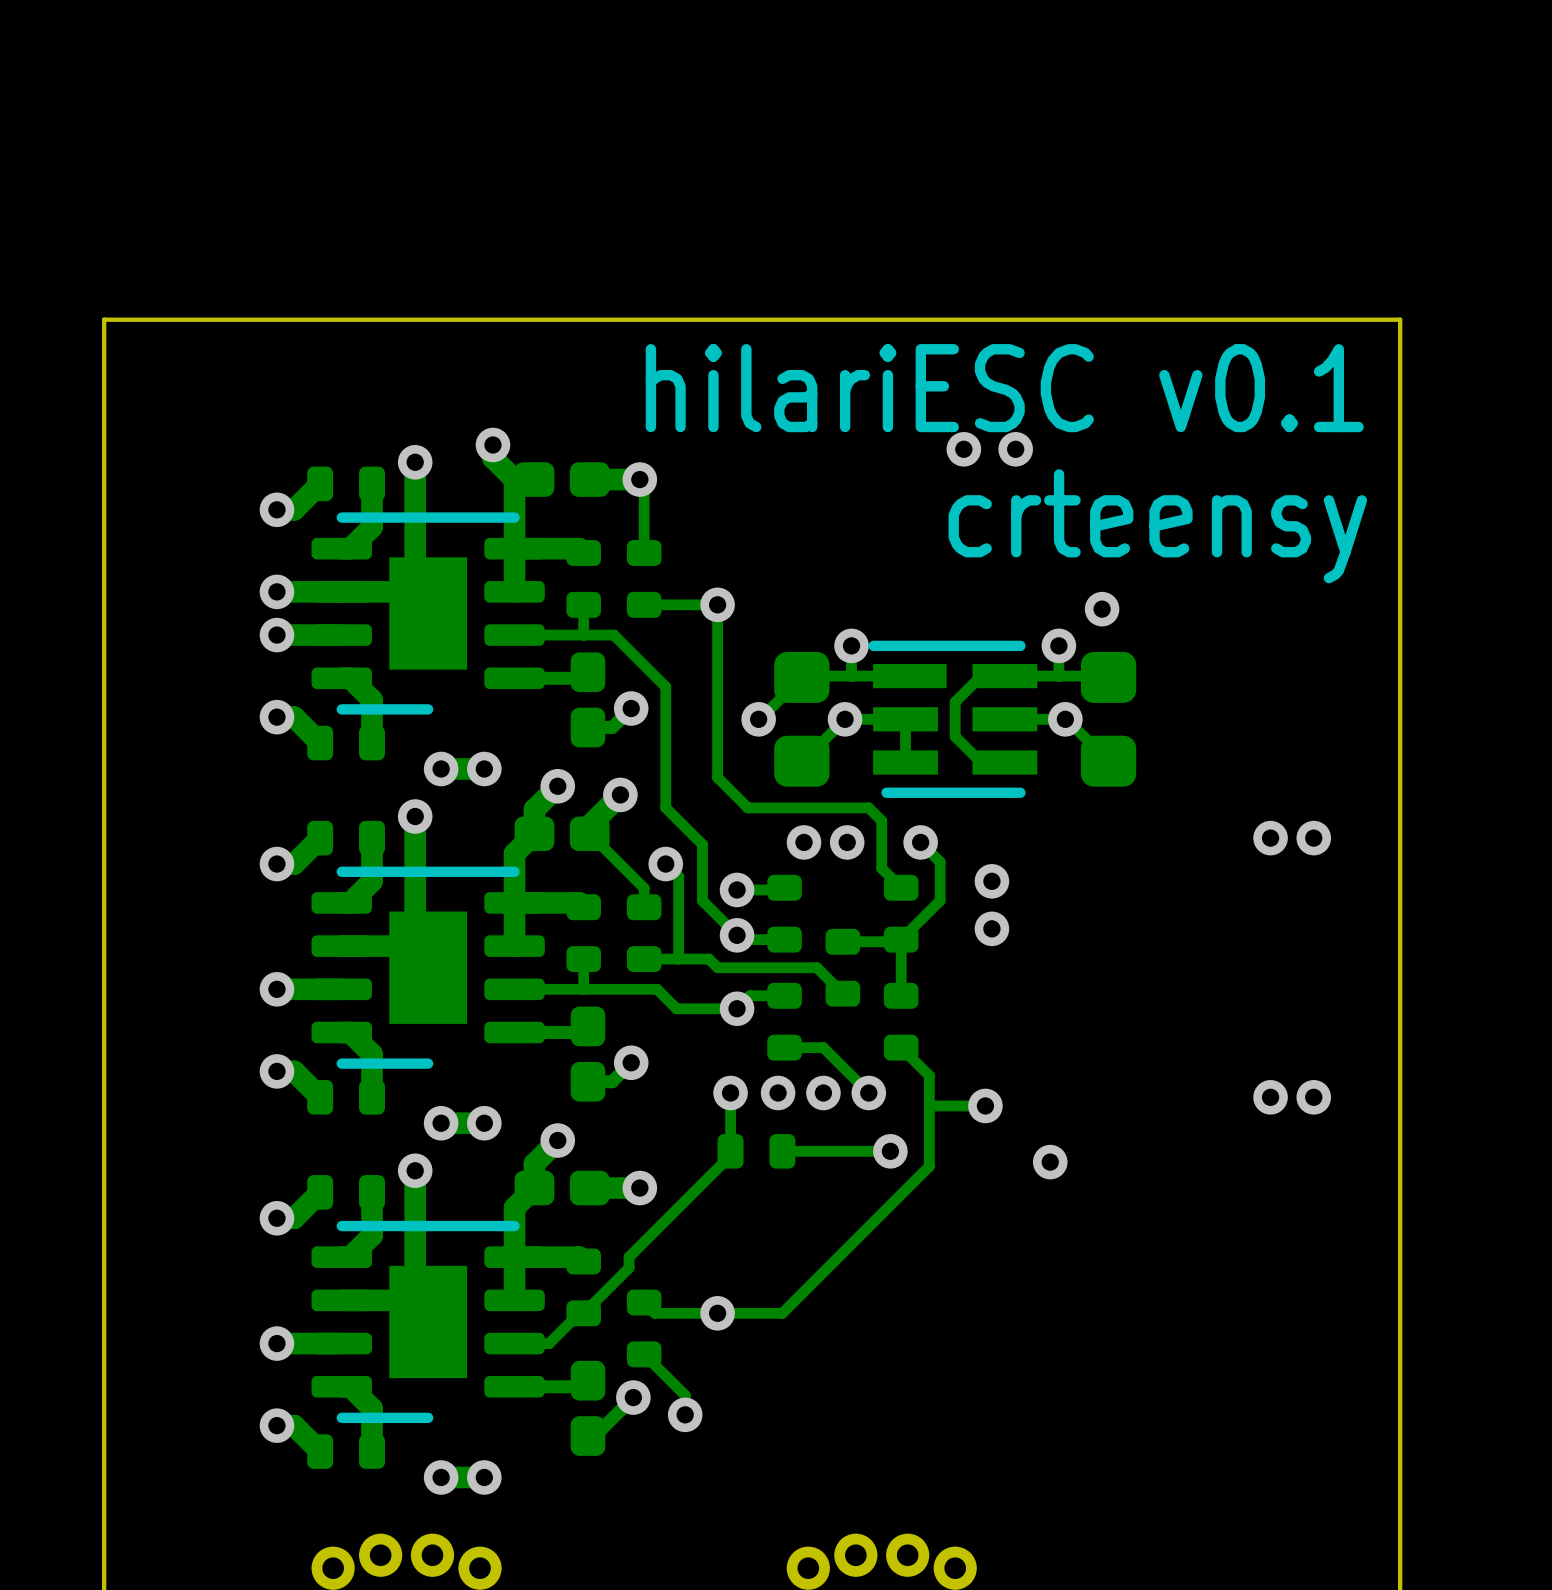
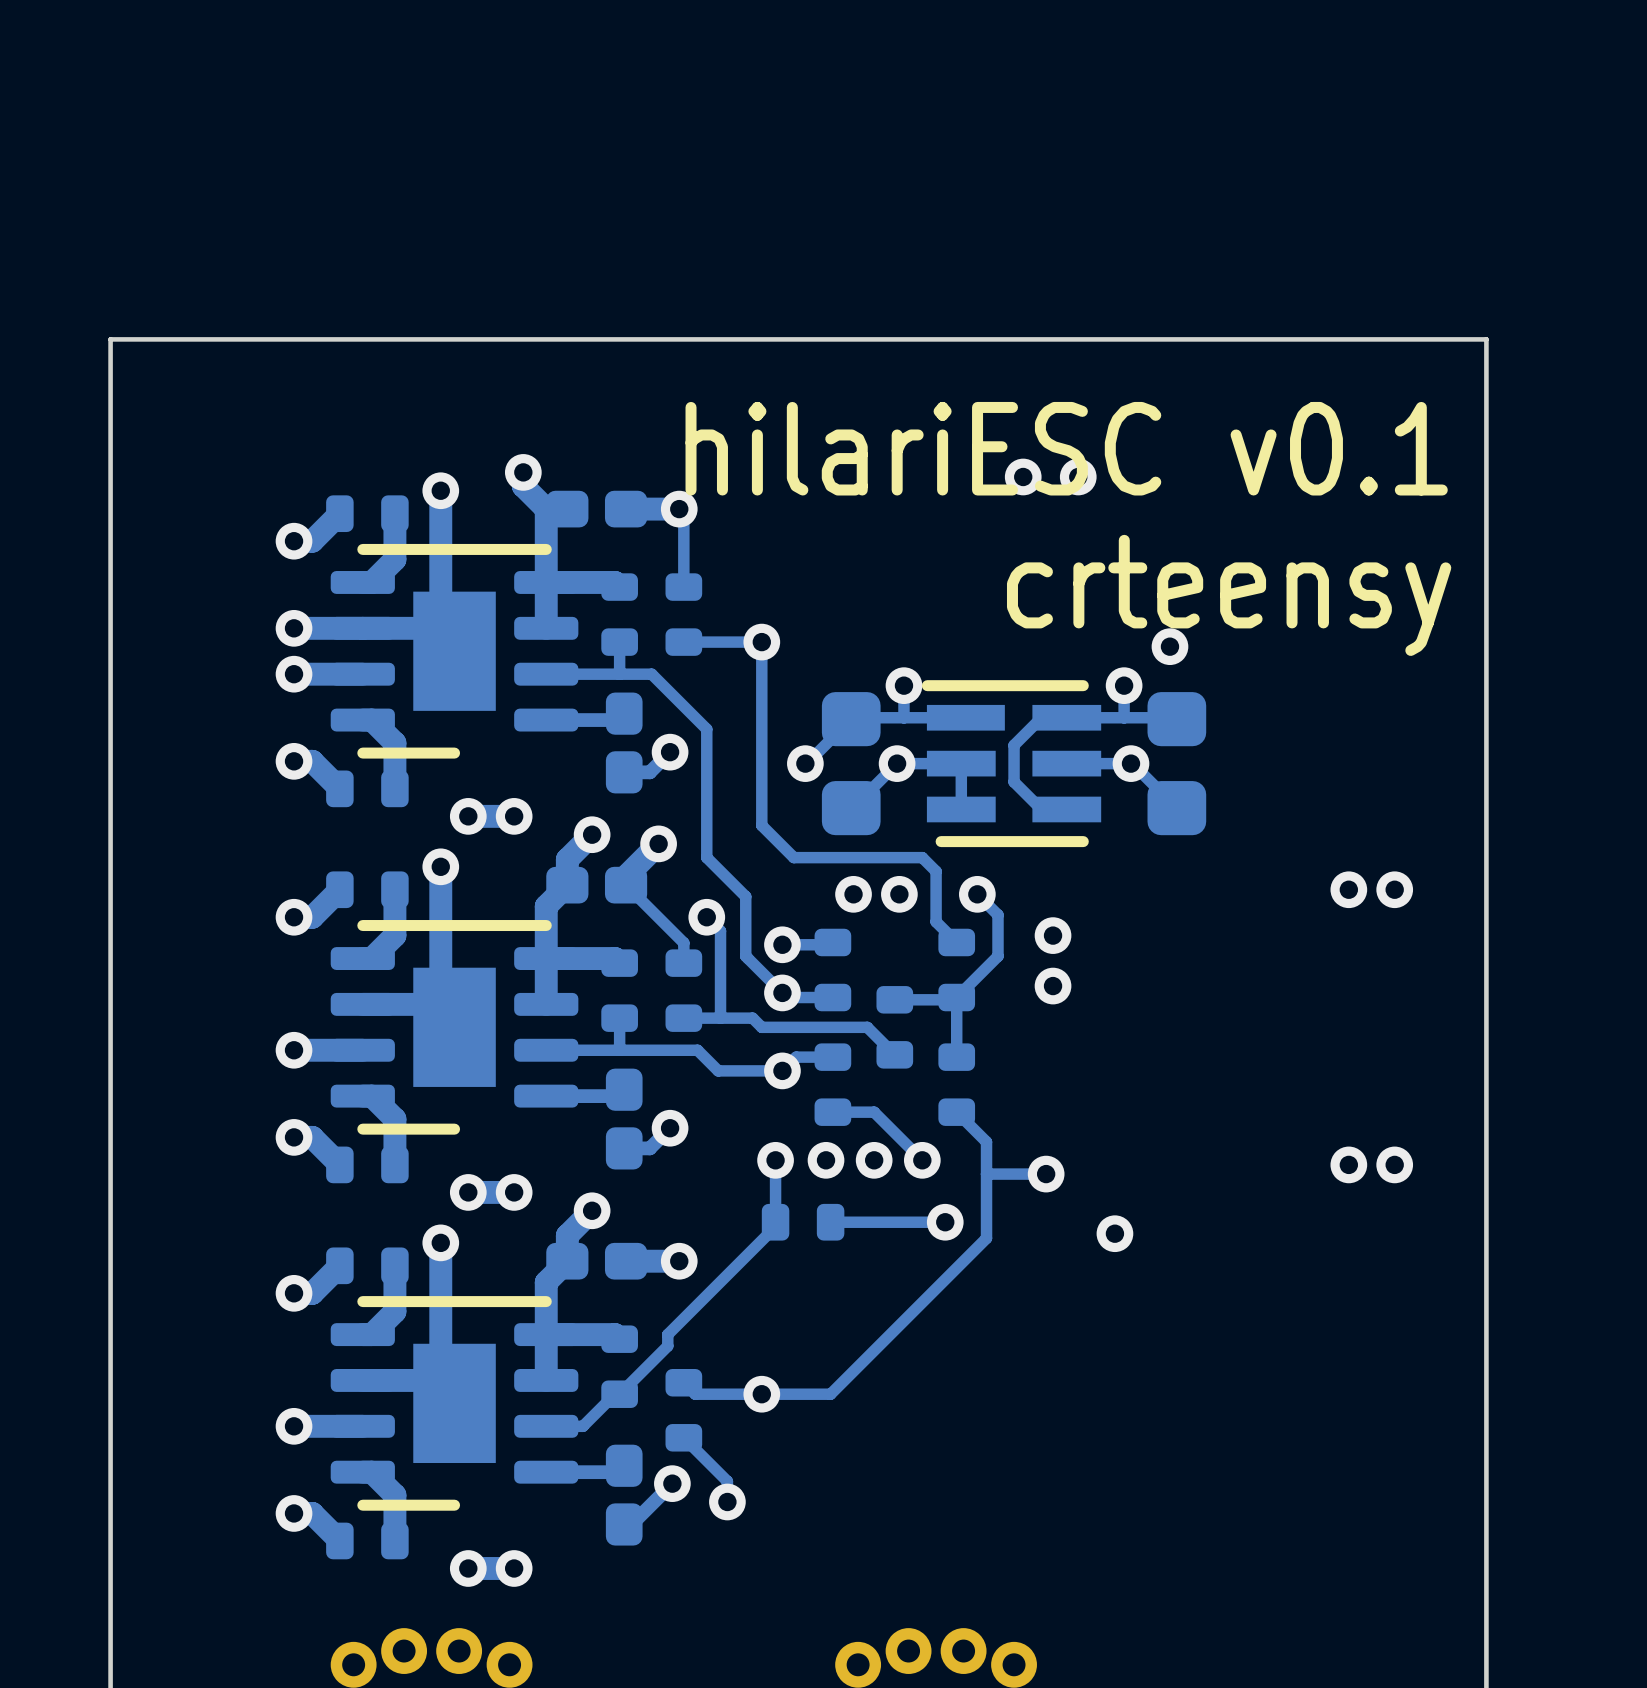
text position: hilariESC v0.1 (1004, 388) -> hilariESC v0.1 (1066, 448)
text position: crteensy (1157, 526) -> crteensy (1229, 595)

